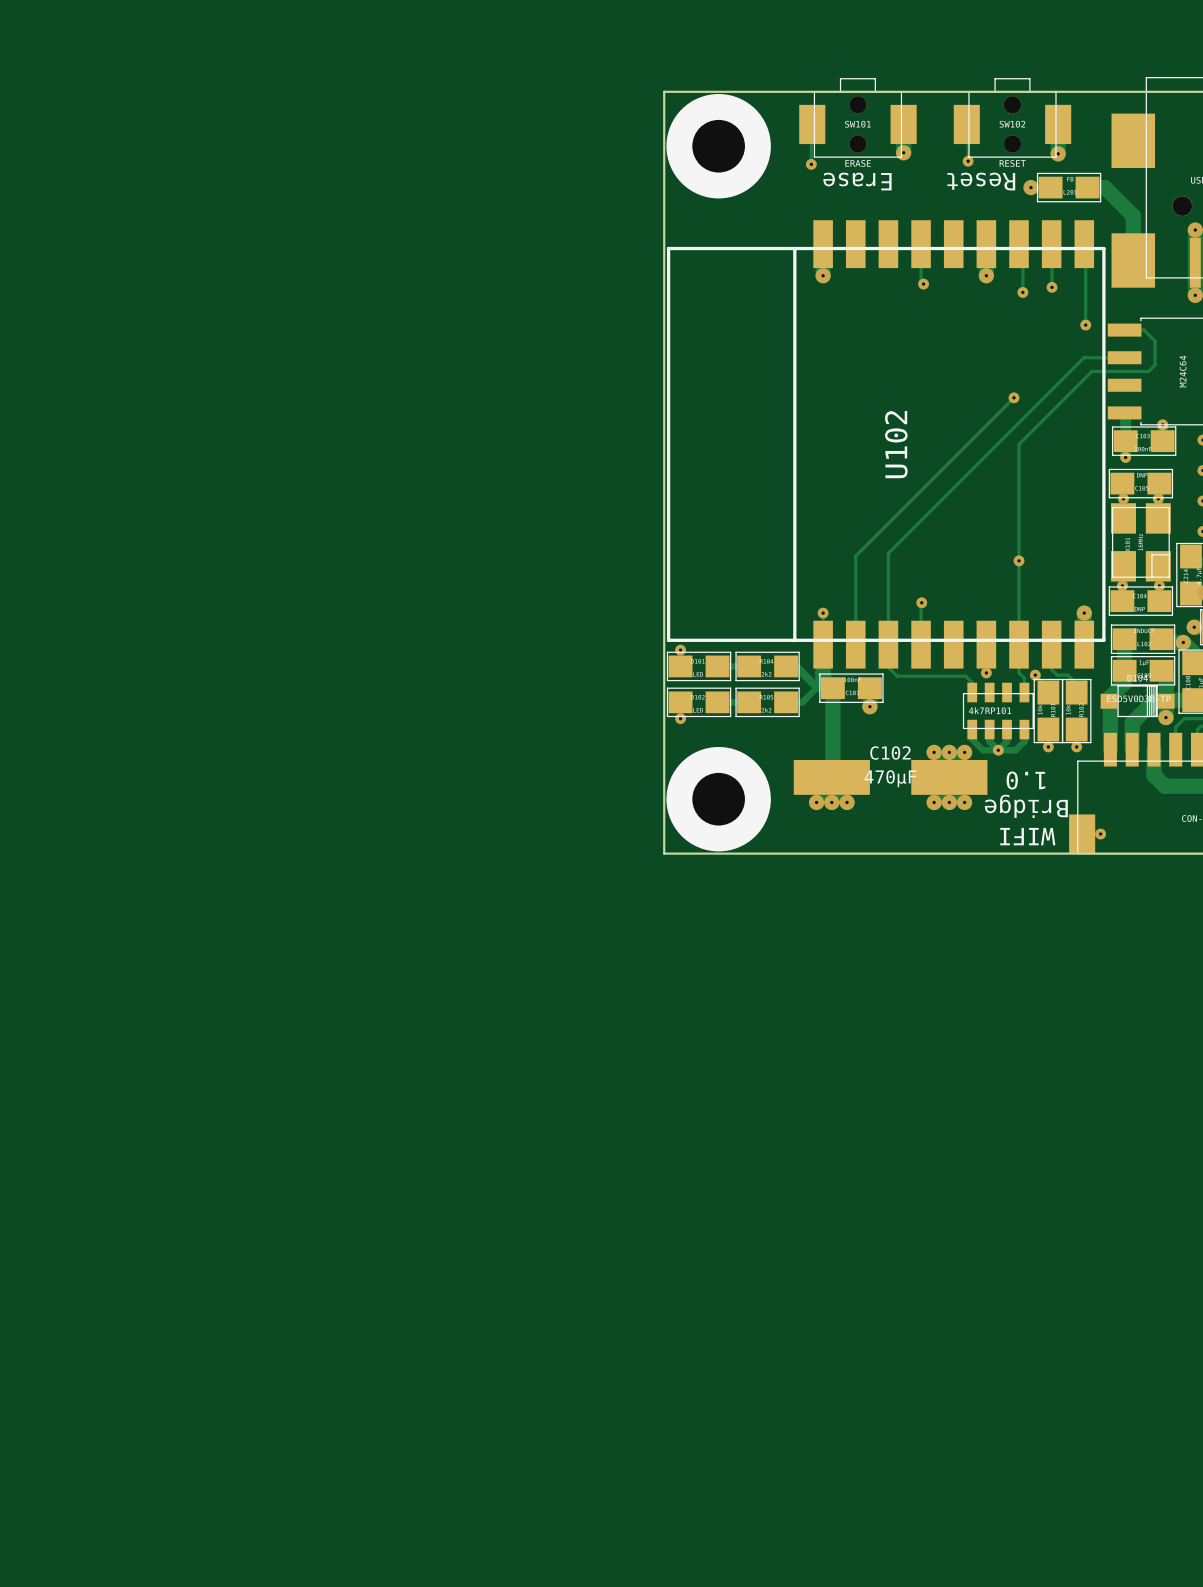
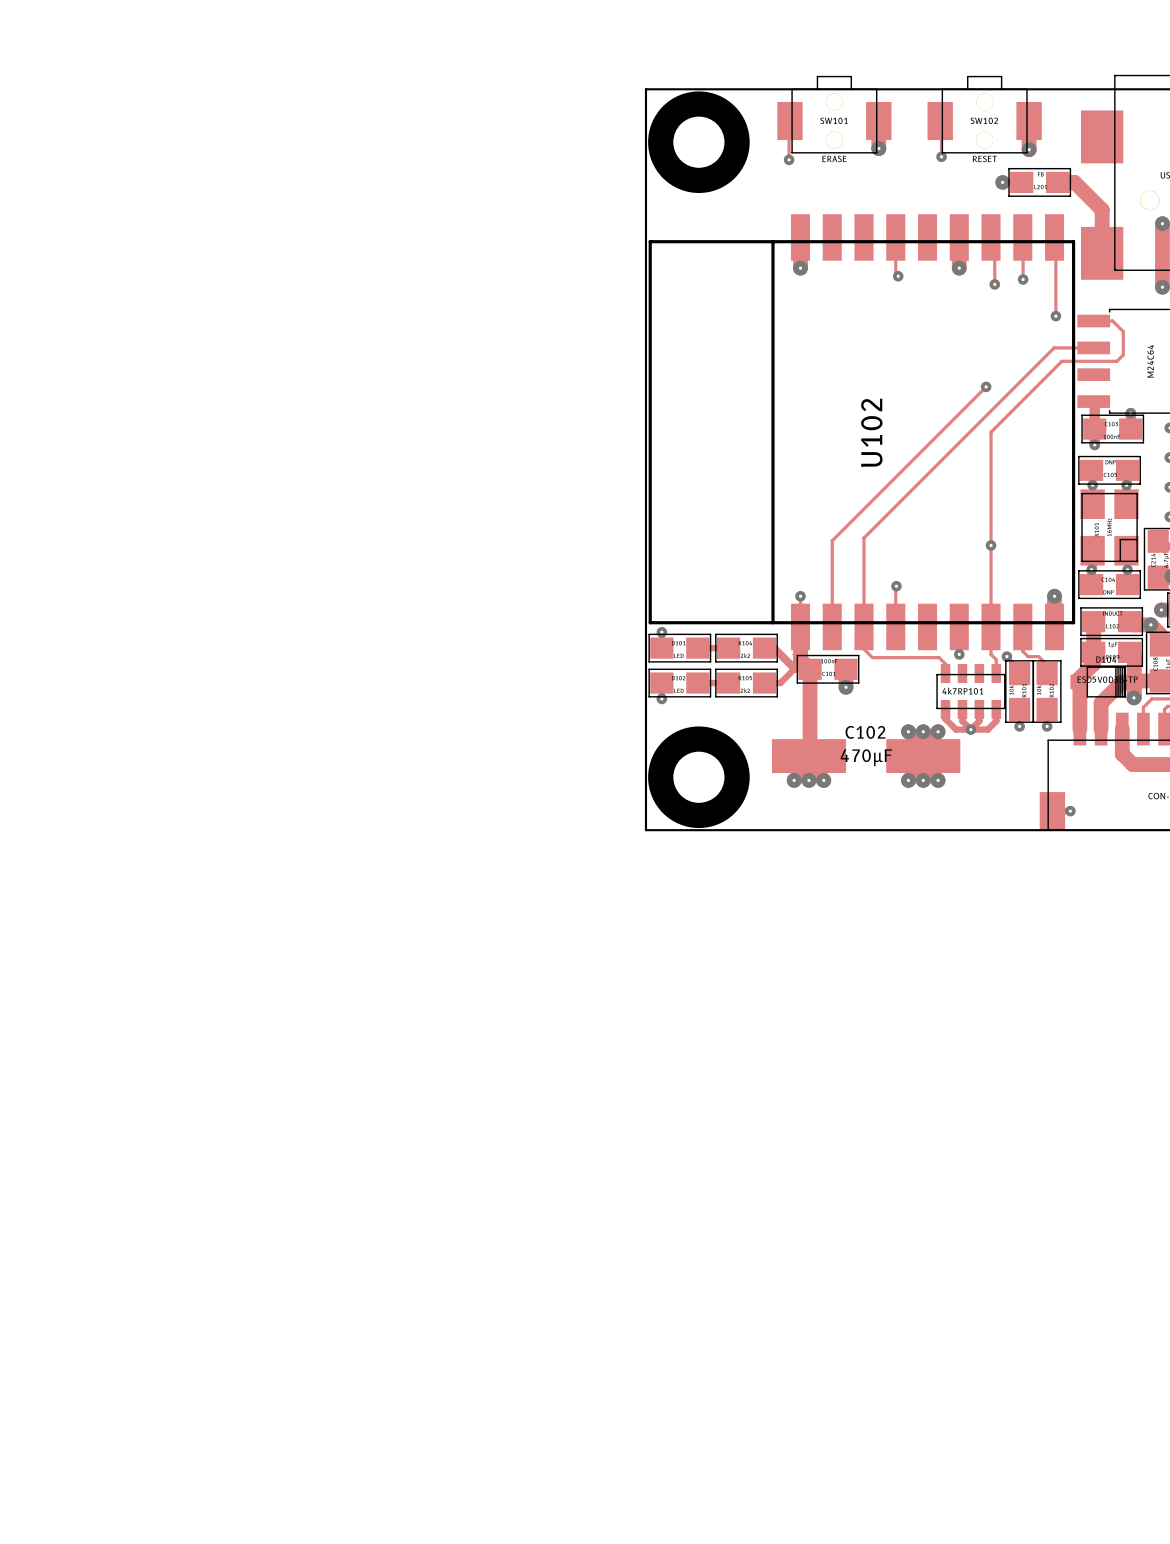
text: Erase (857, 181) -> none
text: Reset (981, 181) -> none
text: 1.0 (1025, 780) -> none
text: Bridge (1026, 806) -> none
text: WIFI (1027, 836) -> none

